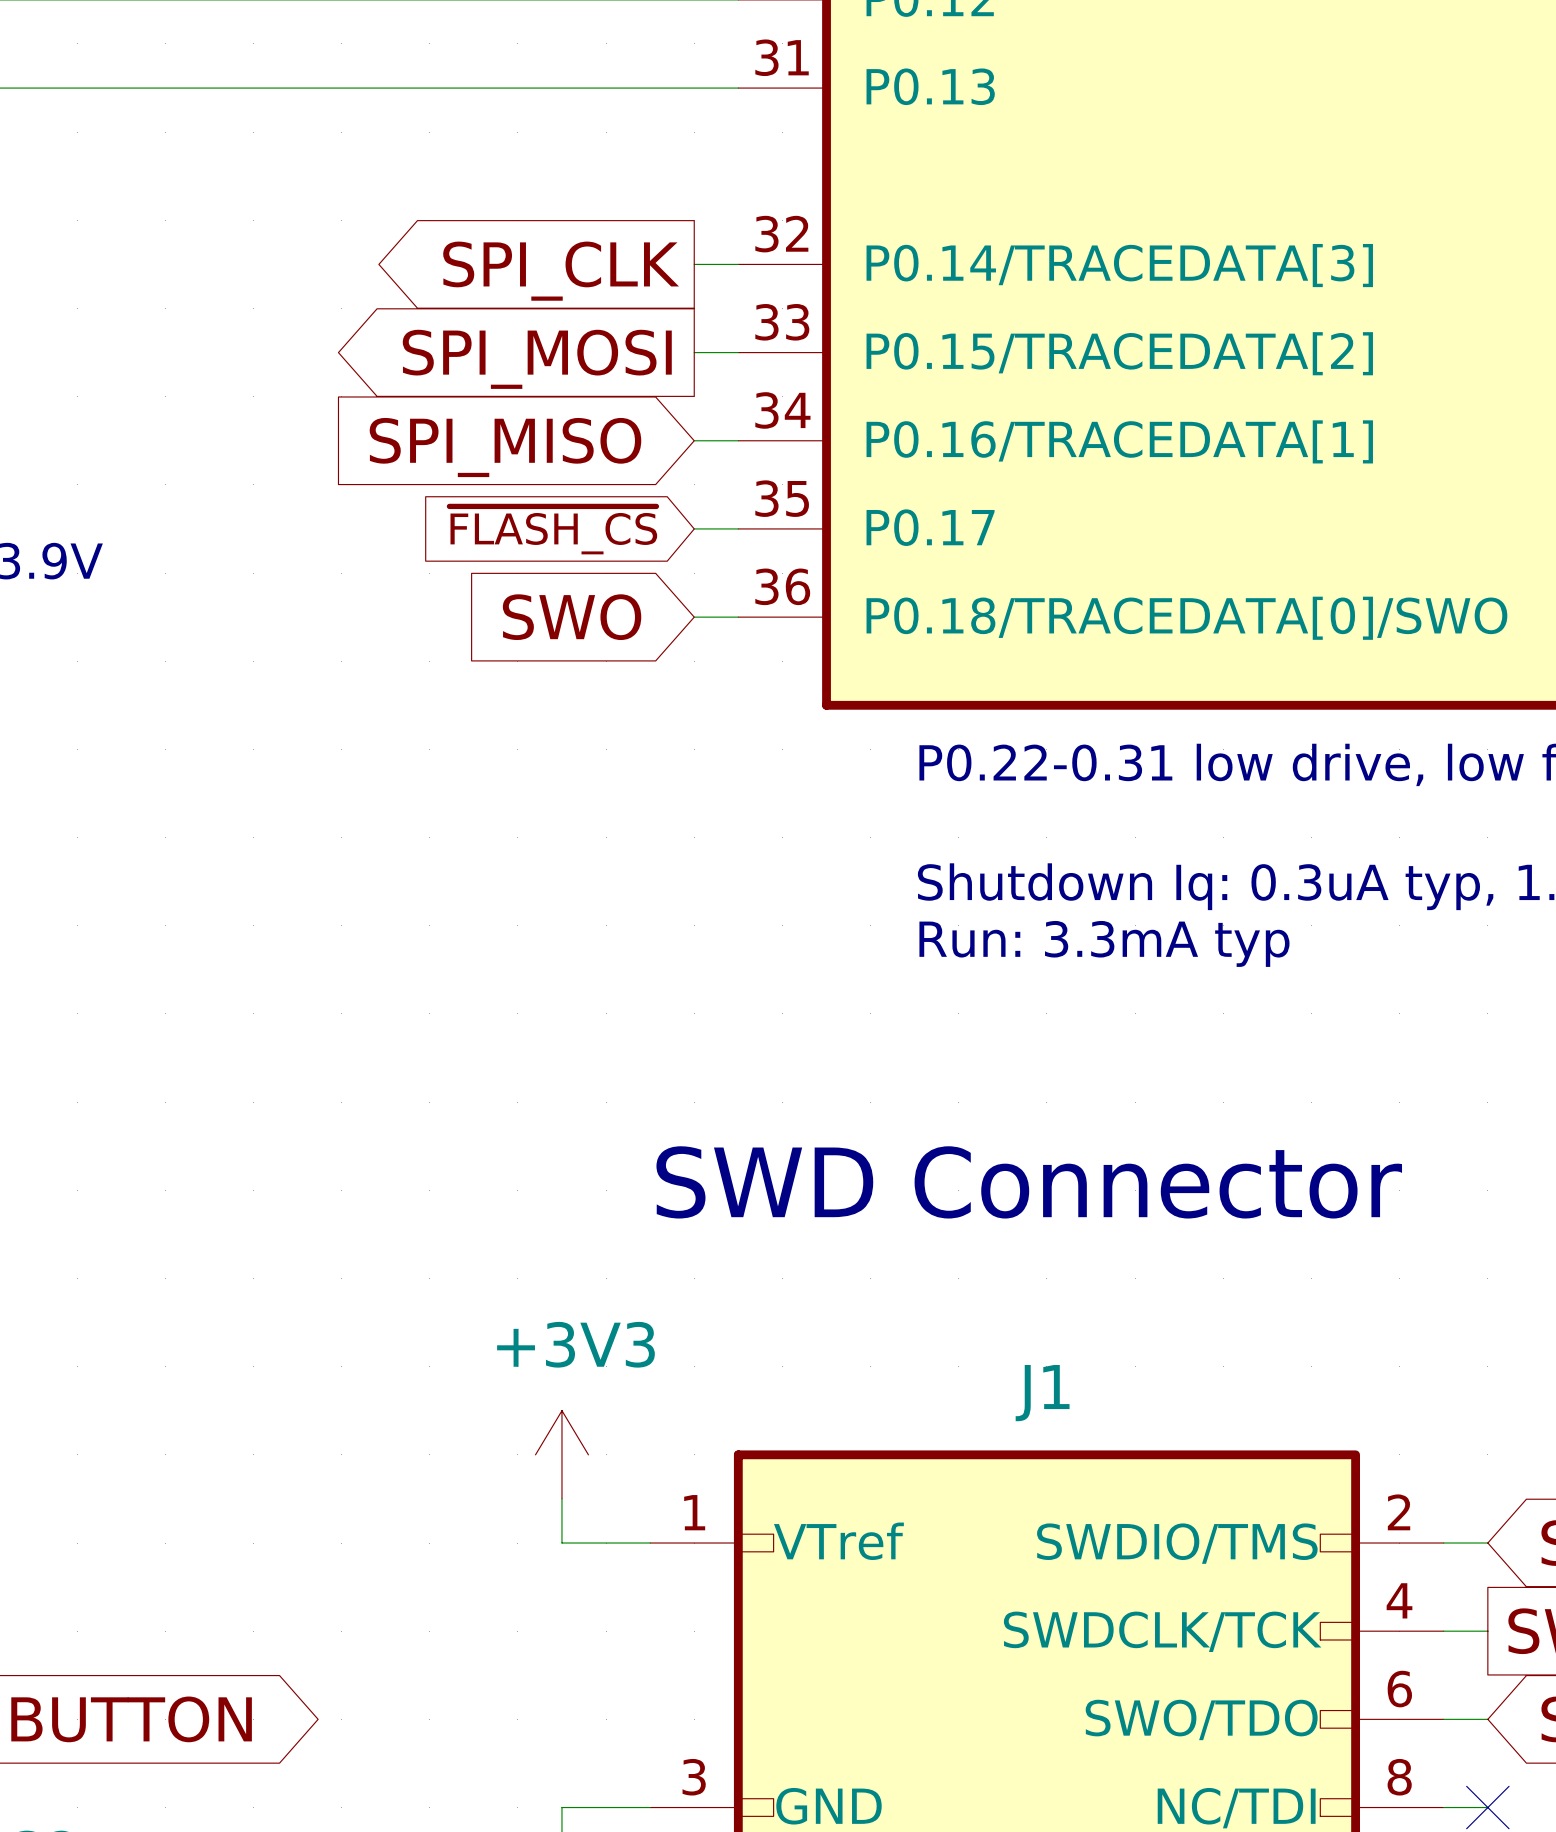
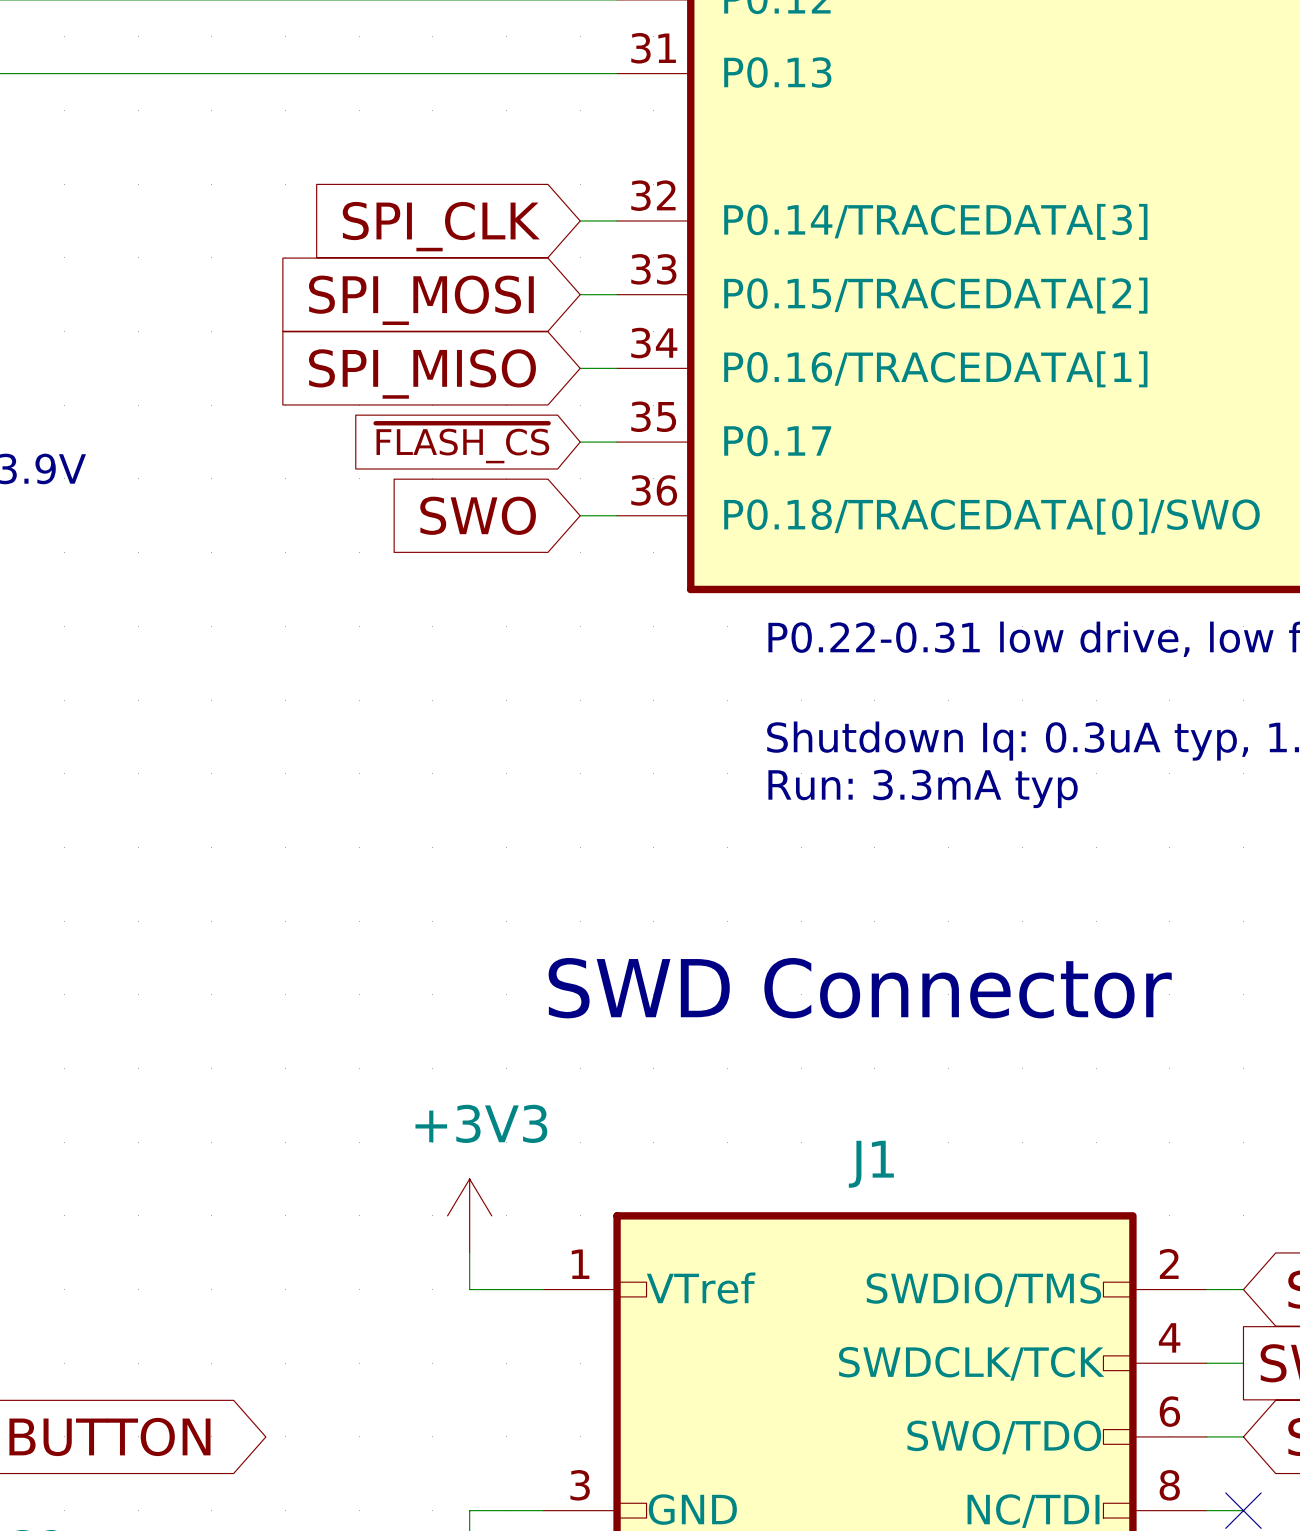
global label shape: output (561, 271) -> input (441, 226)
global label shape: output (537, 359) -> input (421, 300)

